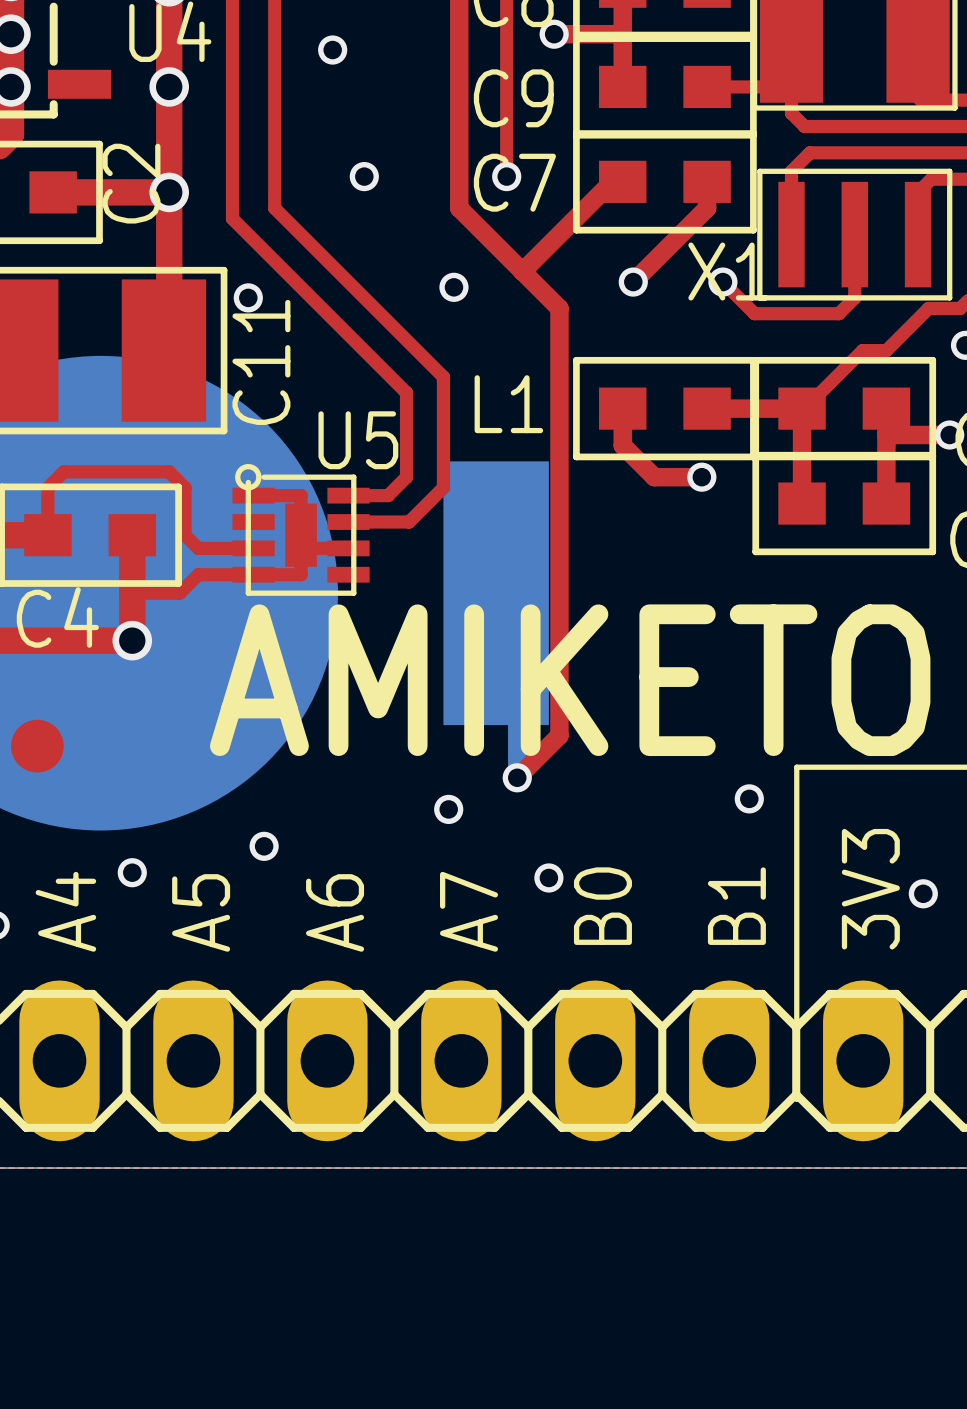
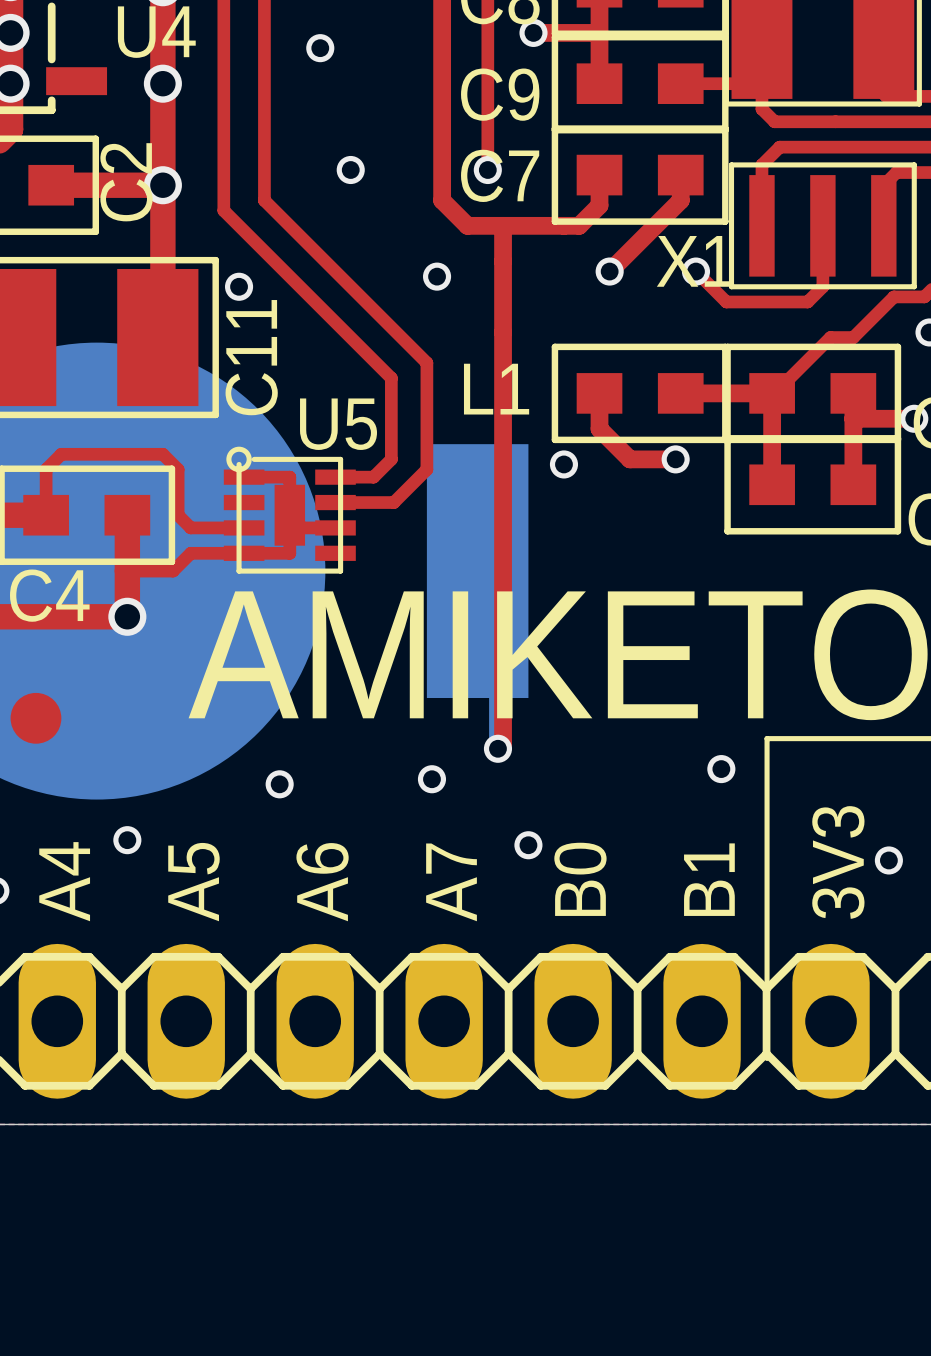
top track: (612, 181) (522, 271) -> none
top track: none -> (599, 175) (599, 205) (579, 225) (467, 225)
top track: (485, 234) (559, 308) (559, 735) (522, 772) -> (503, 225) (503, 743)
via: none -> (563, 464)
via position: (264, 846) -> (279, 784)

